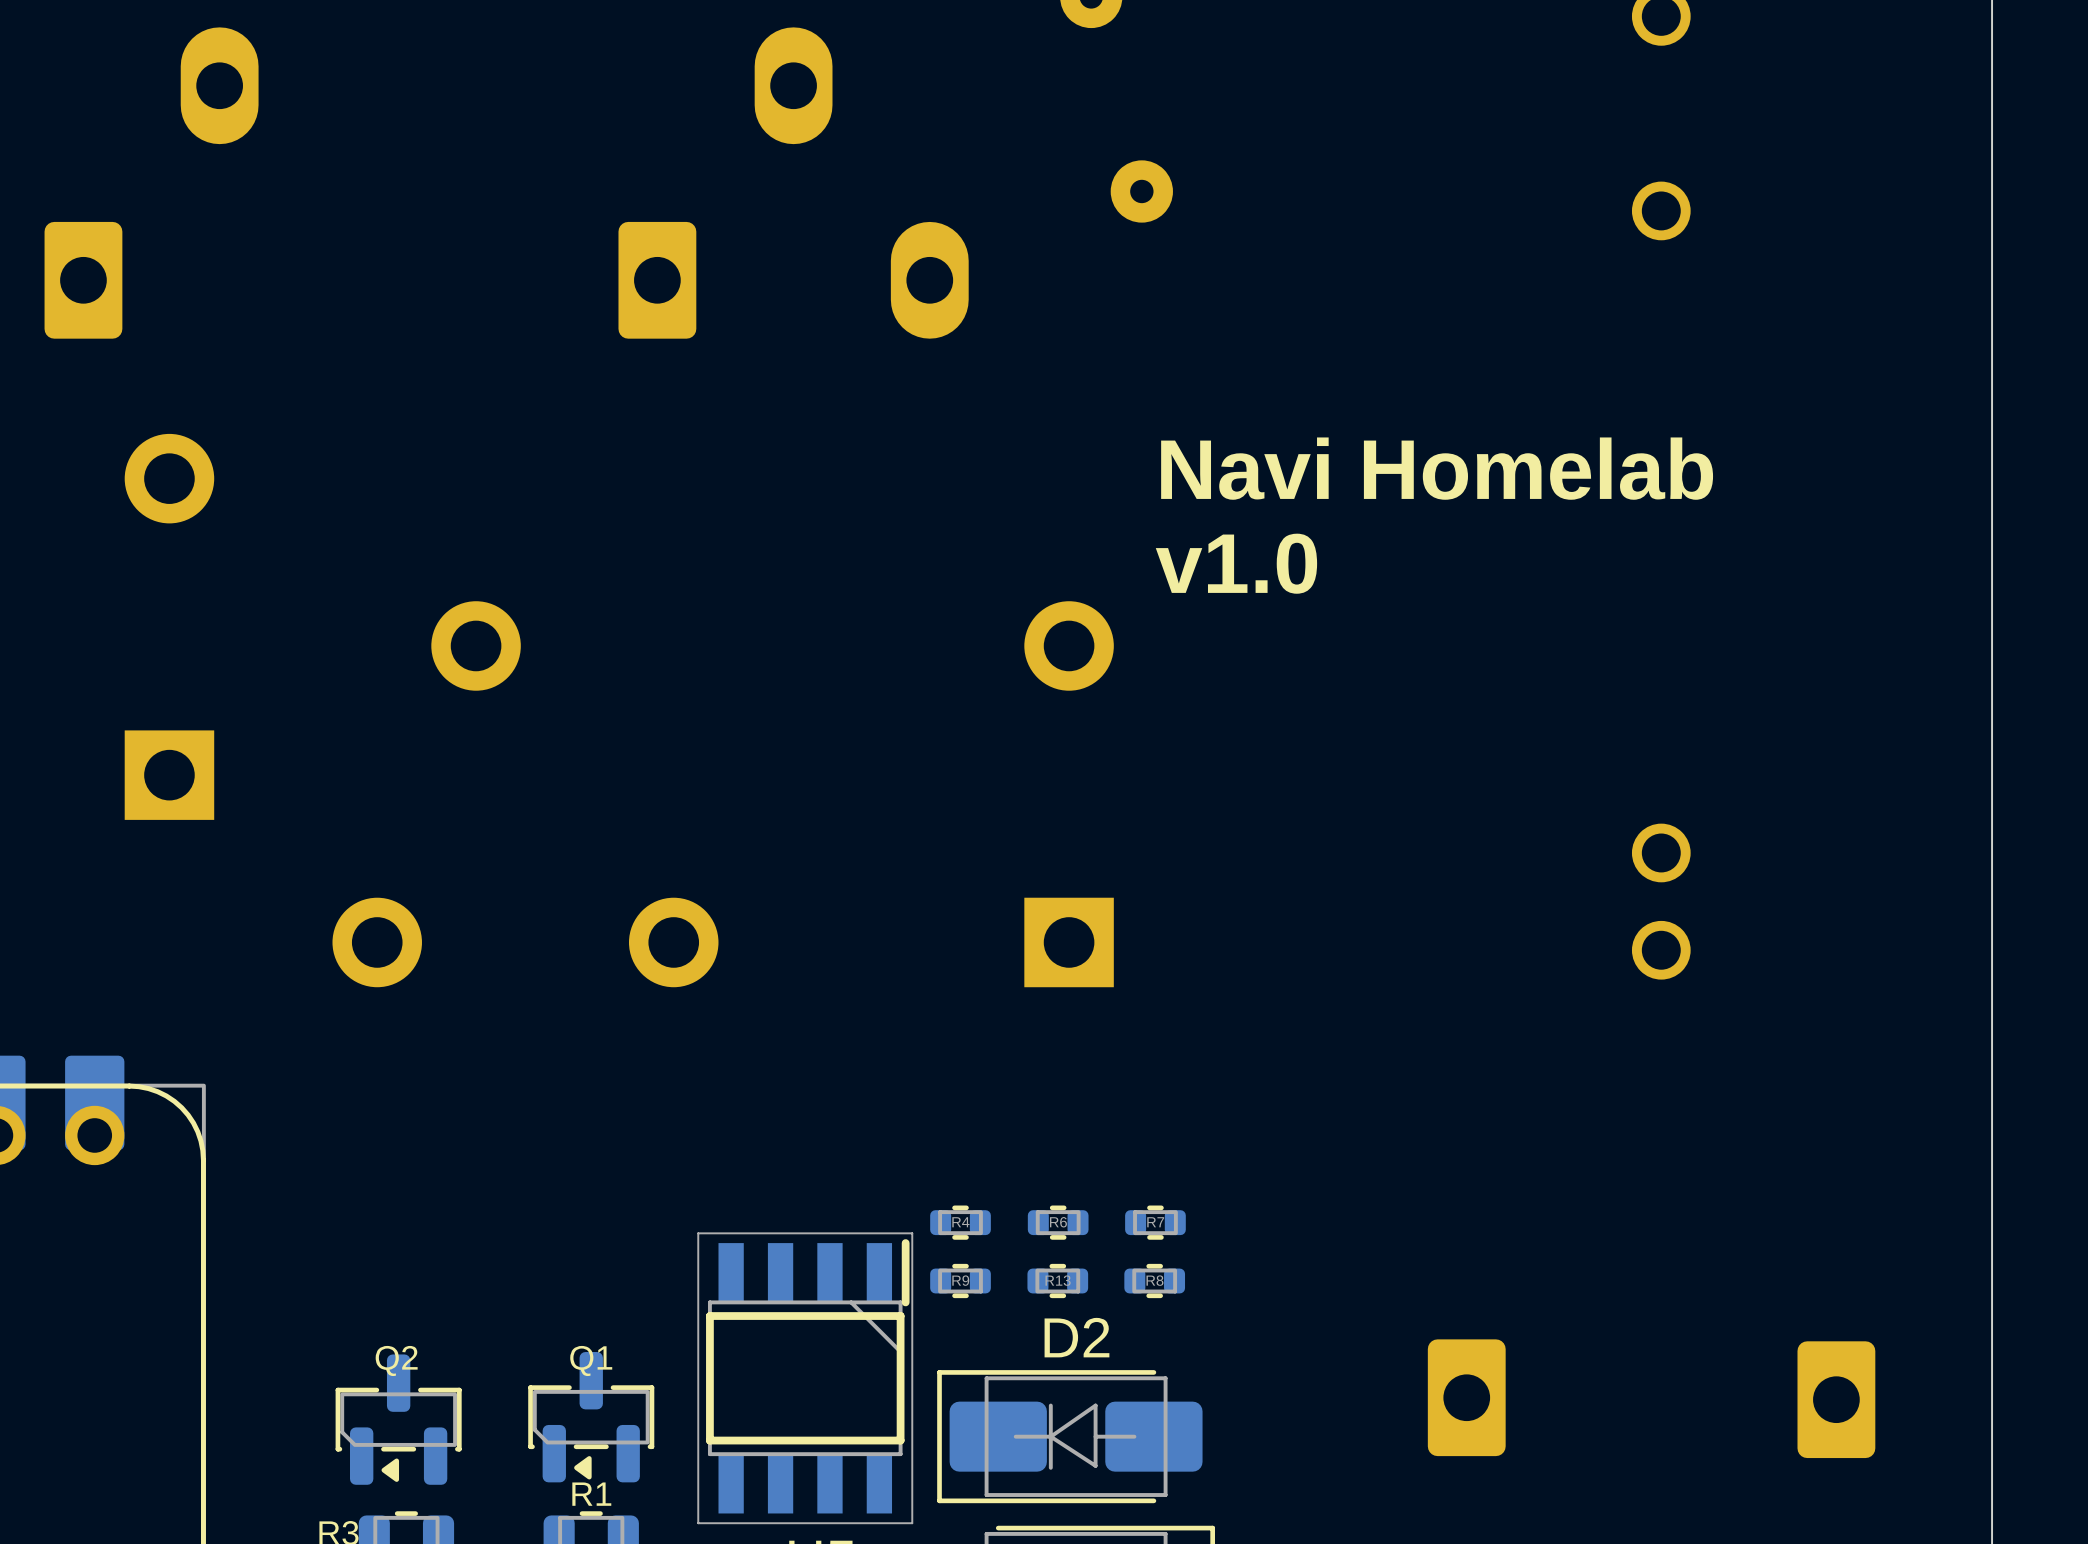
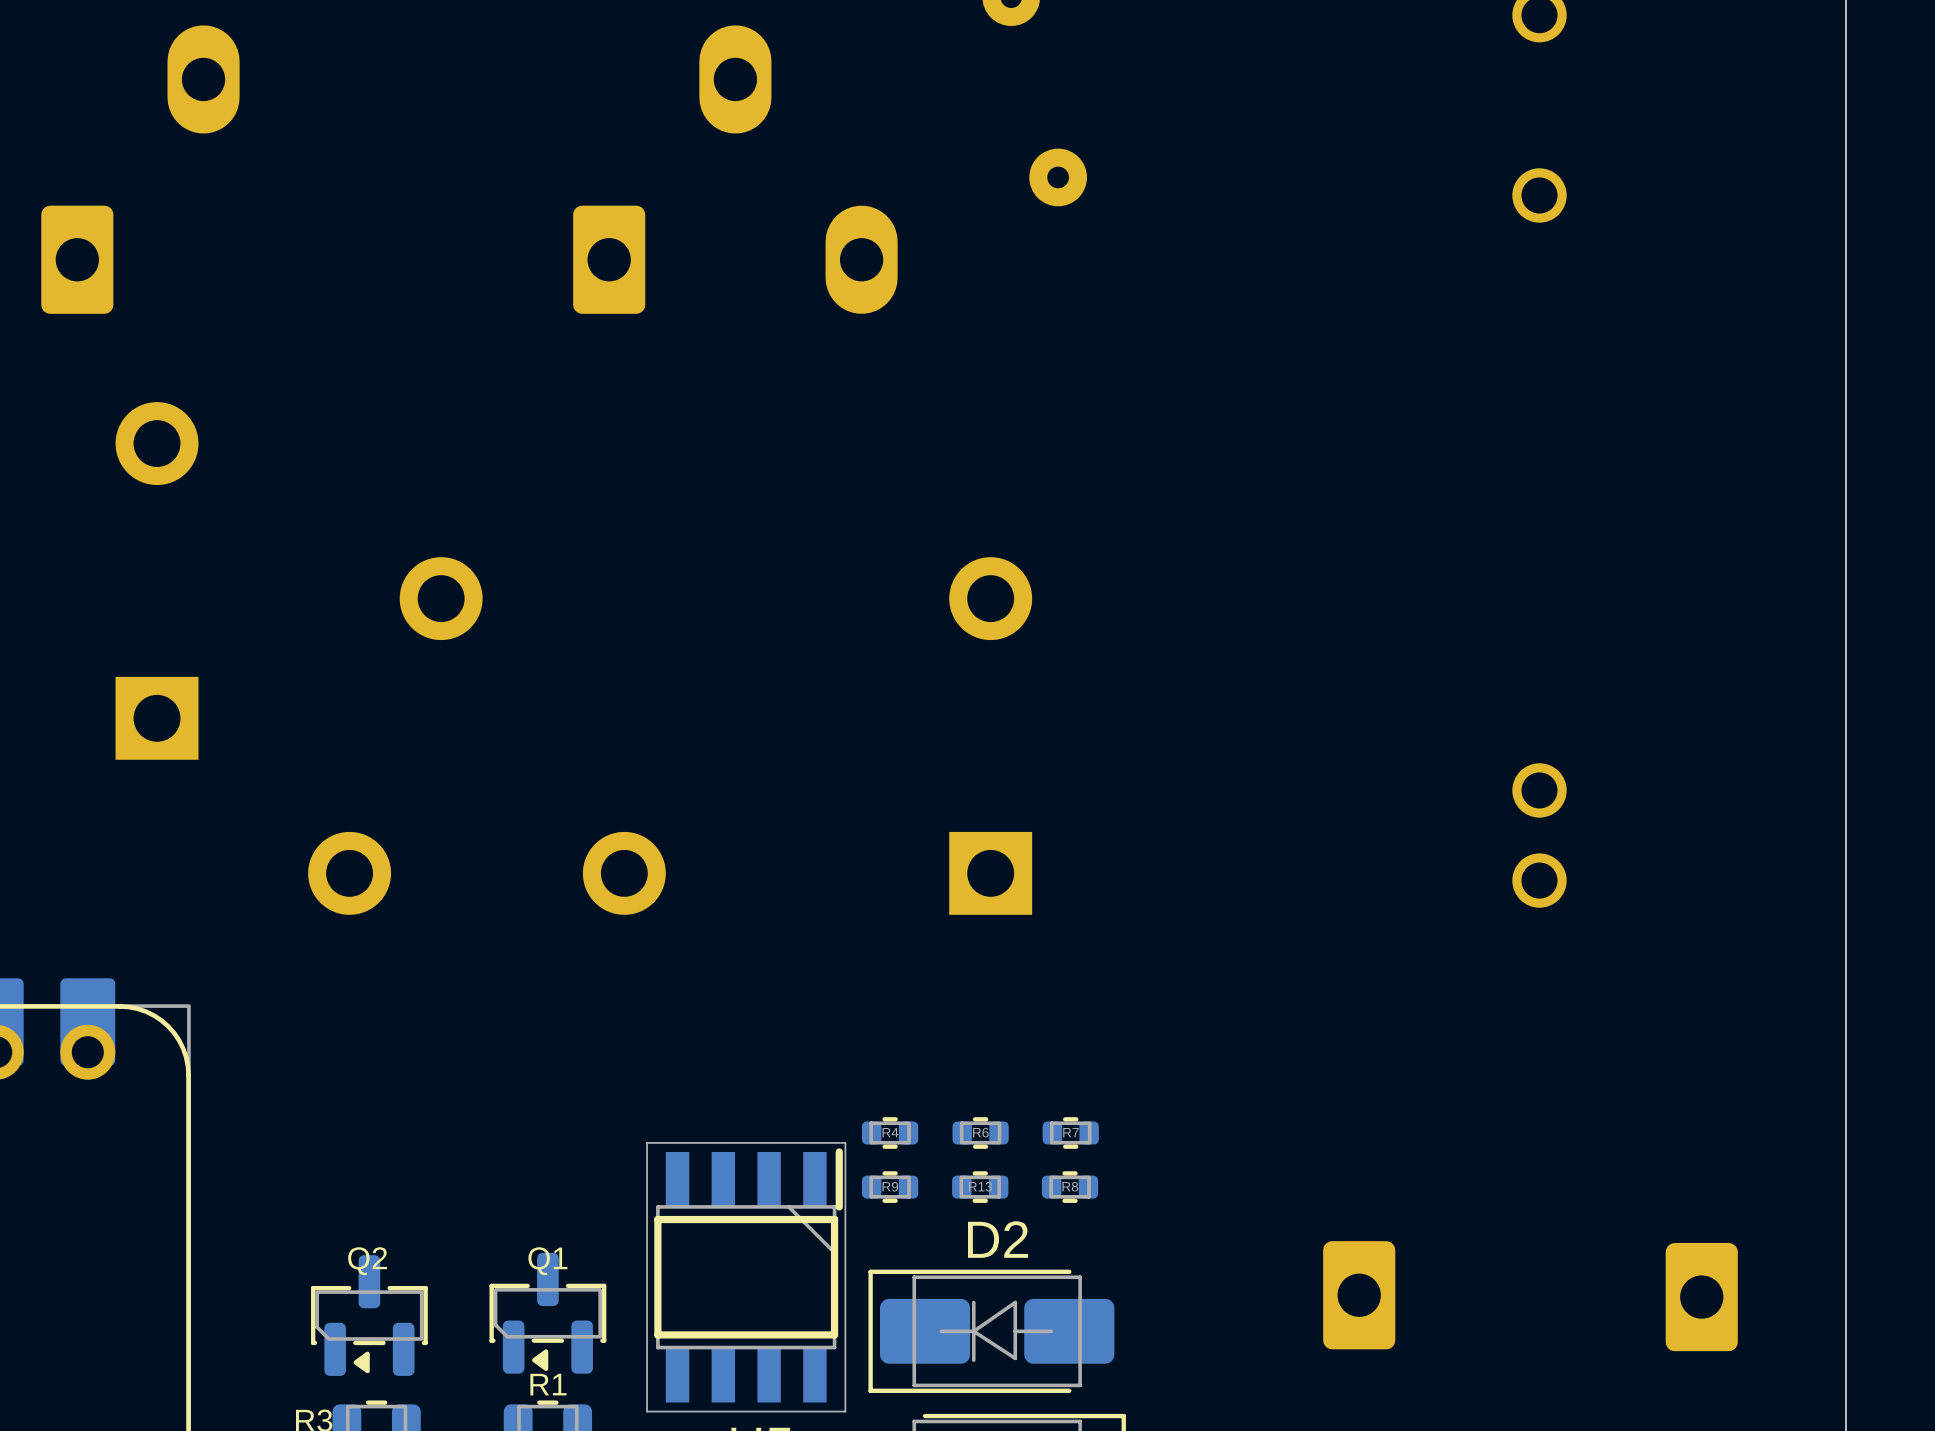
text: Navi Homelab (1437, 468) -> none
text: v1.0 (1236, 563) -> none

